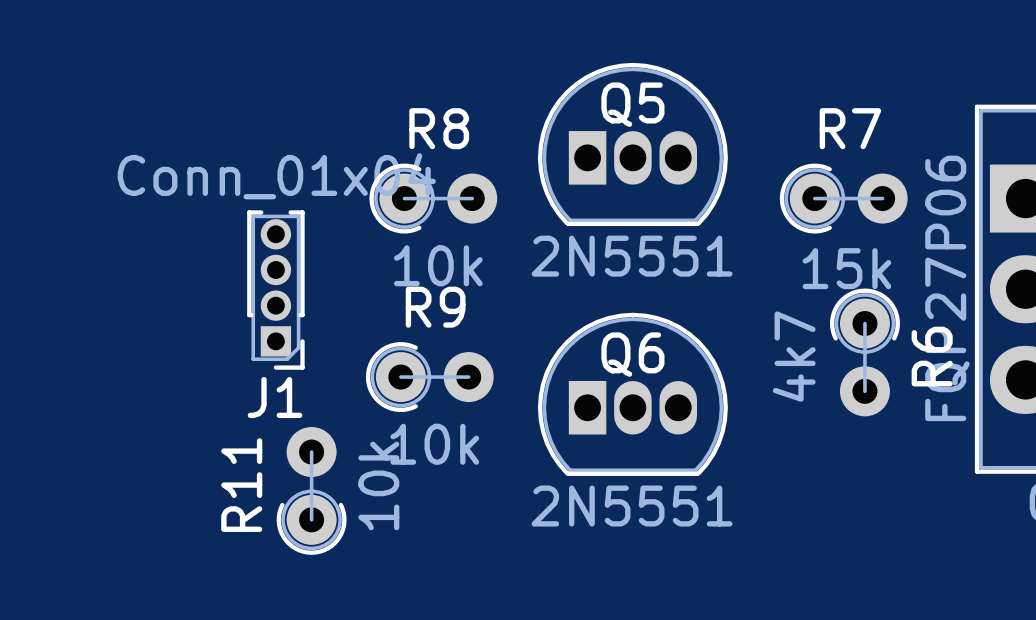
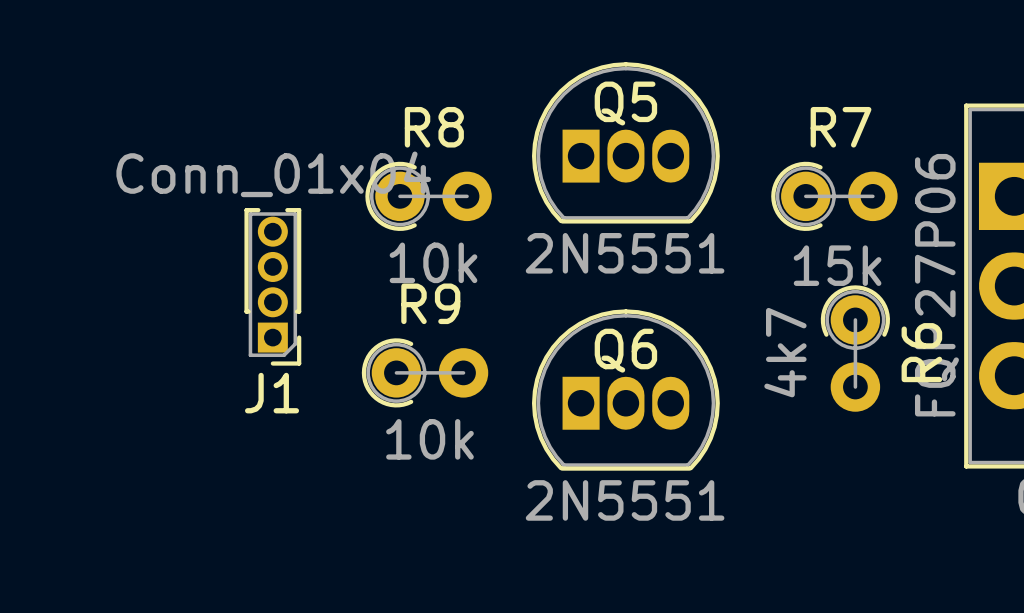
R11: 10k (311, 490) -> none

